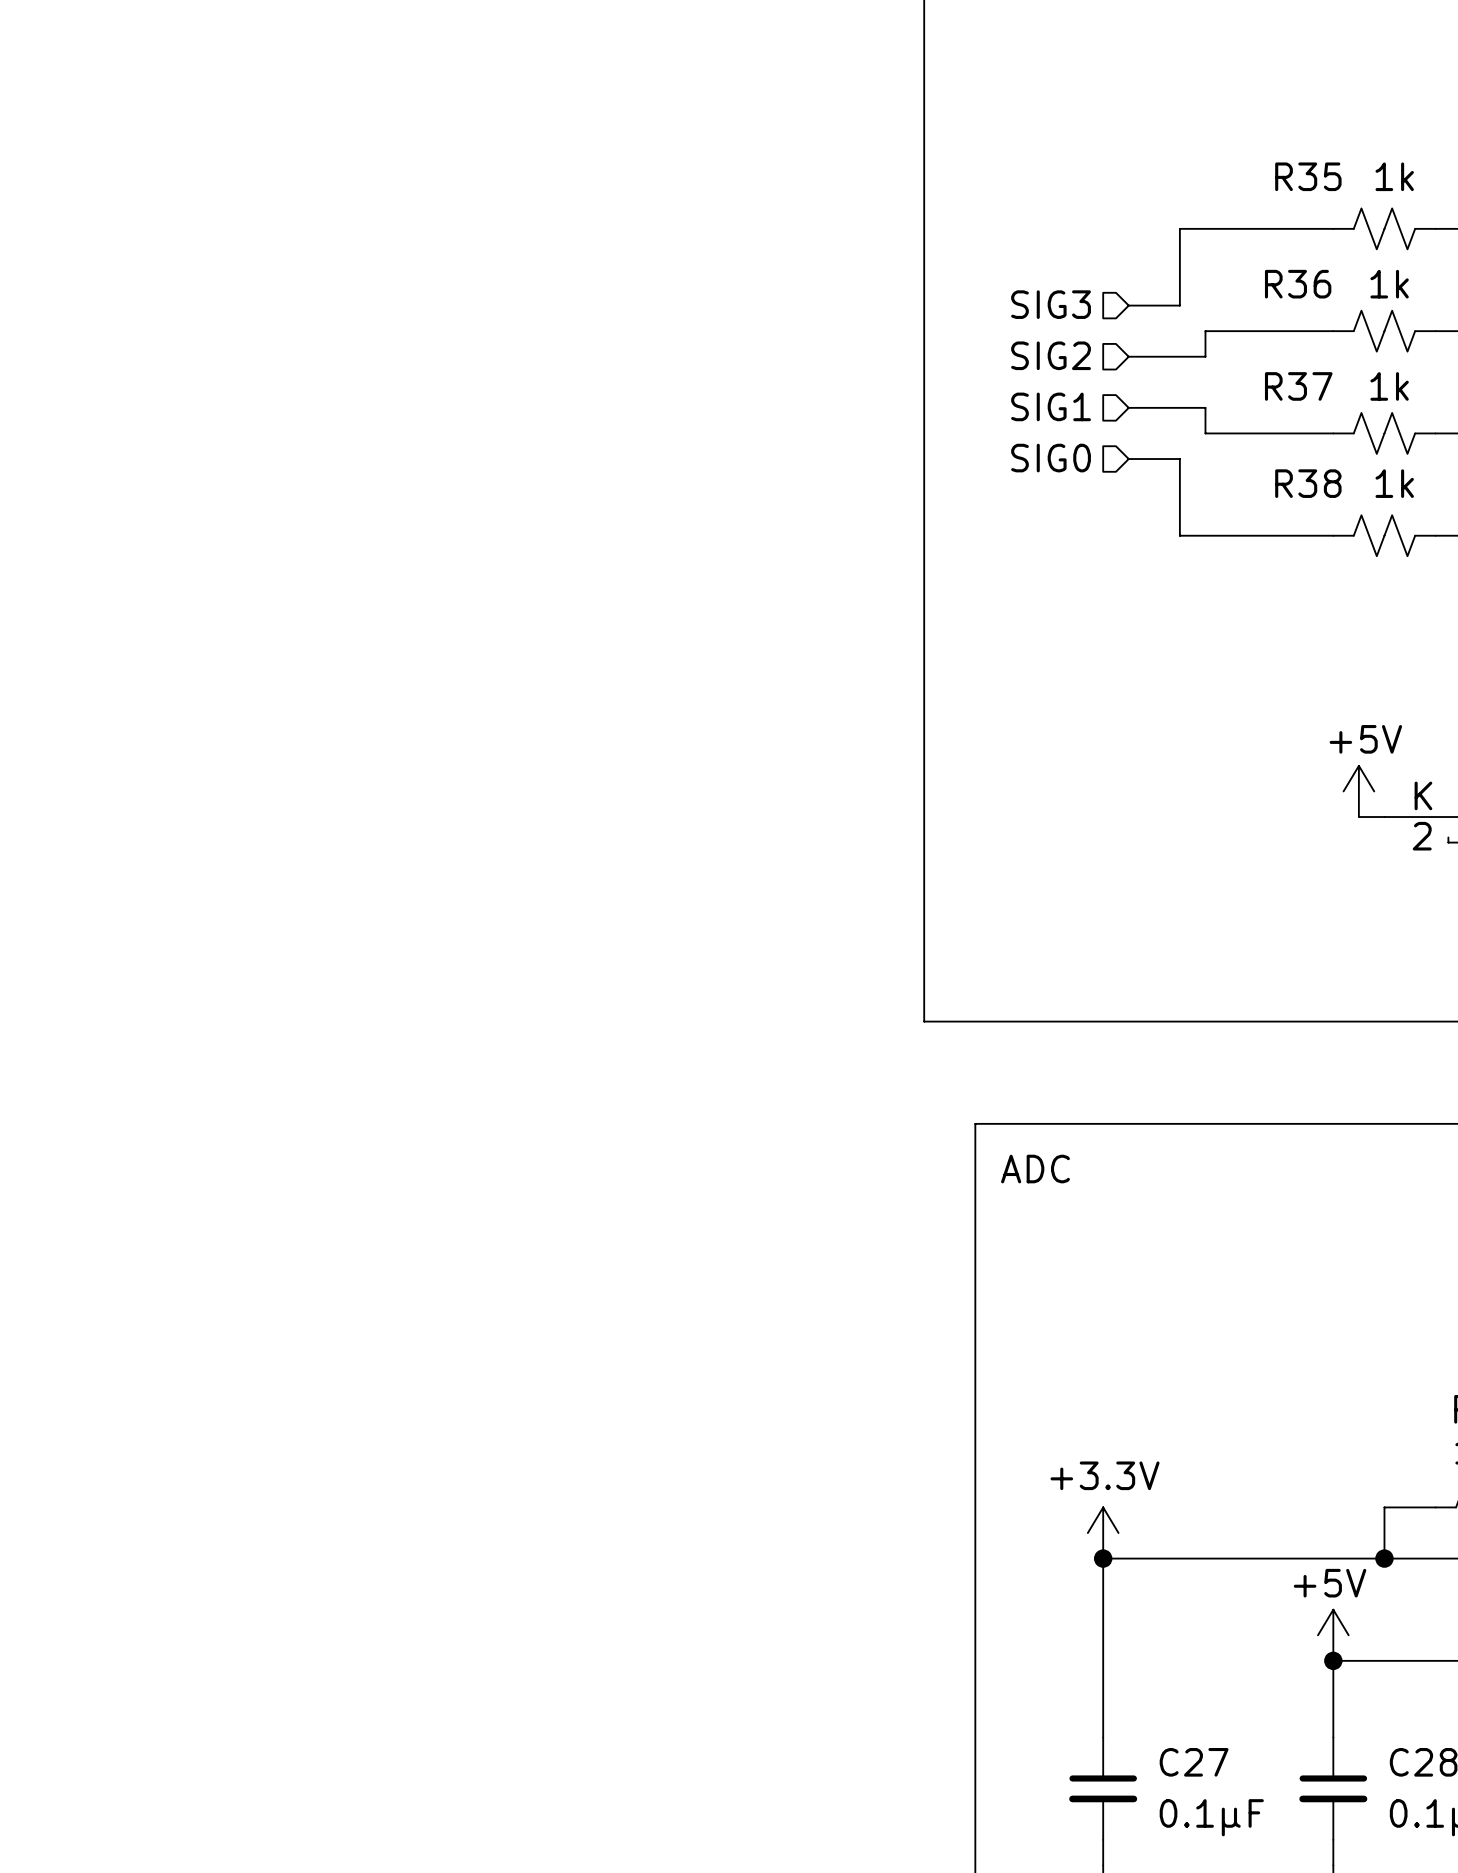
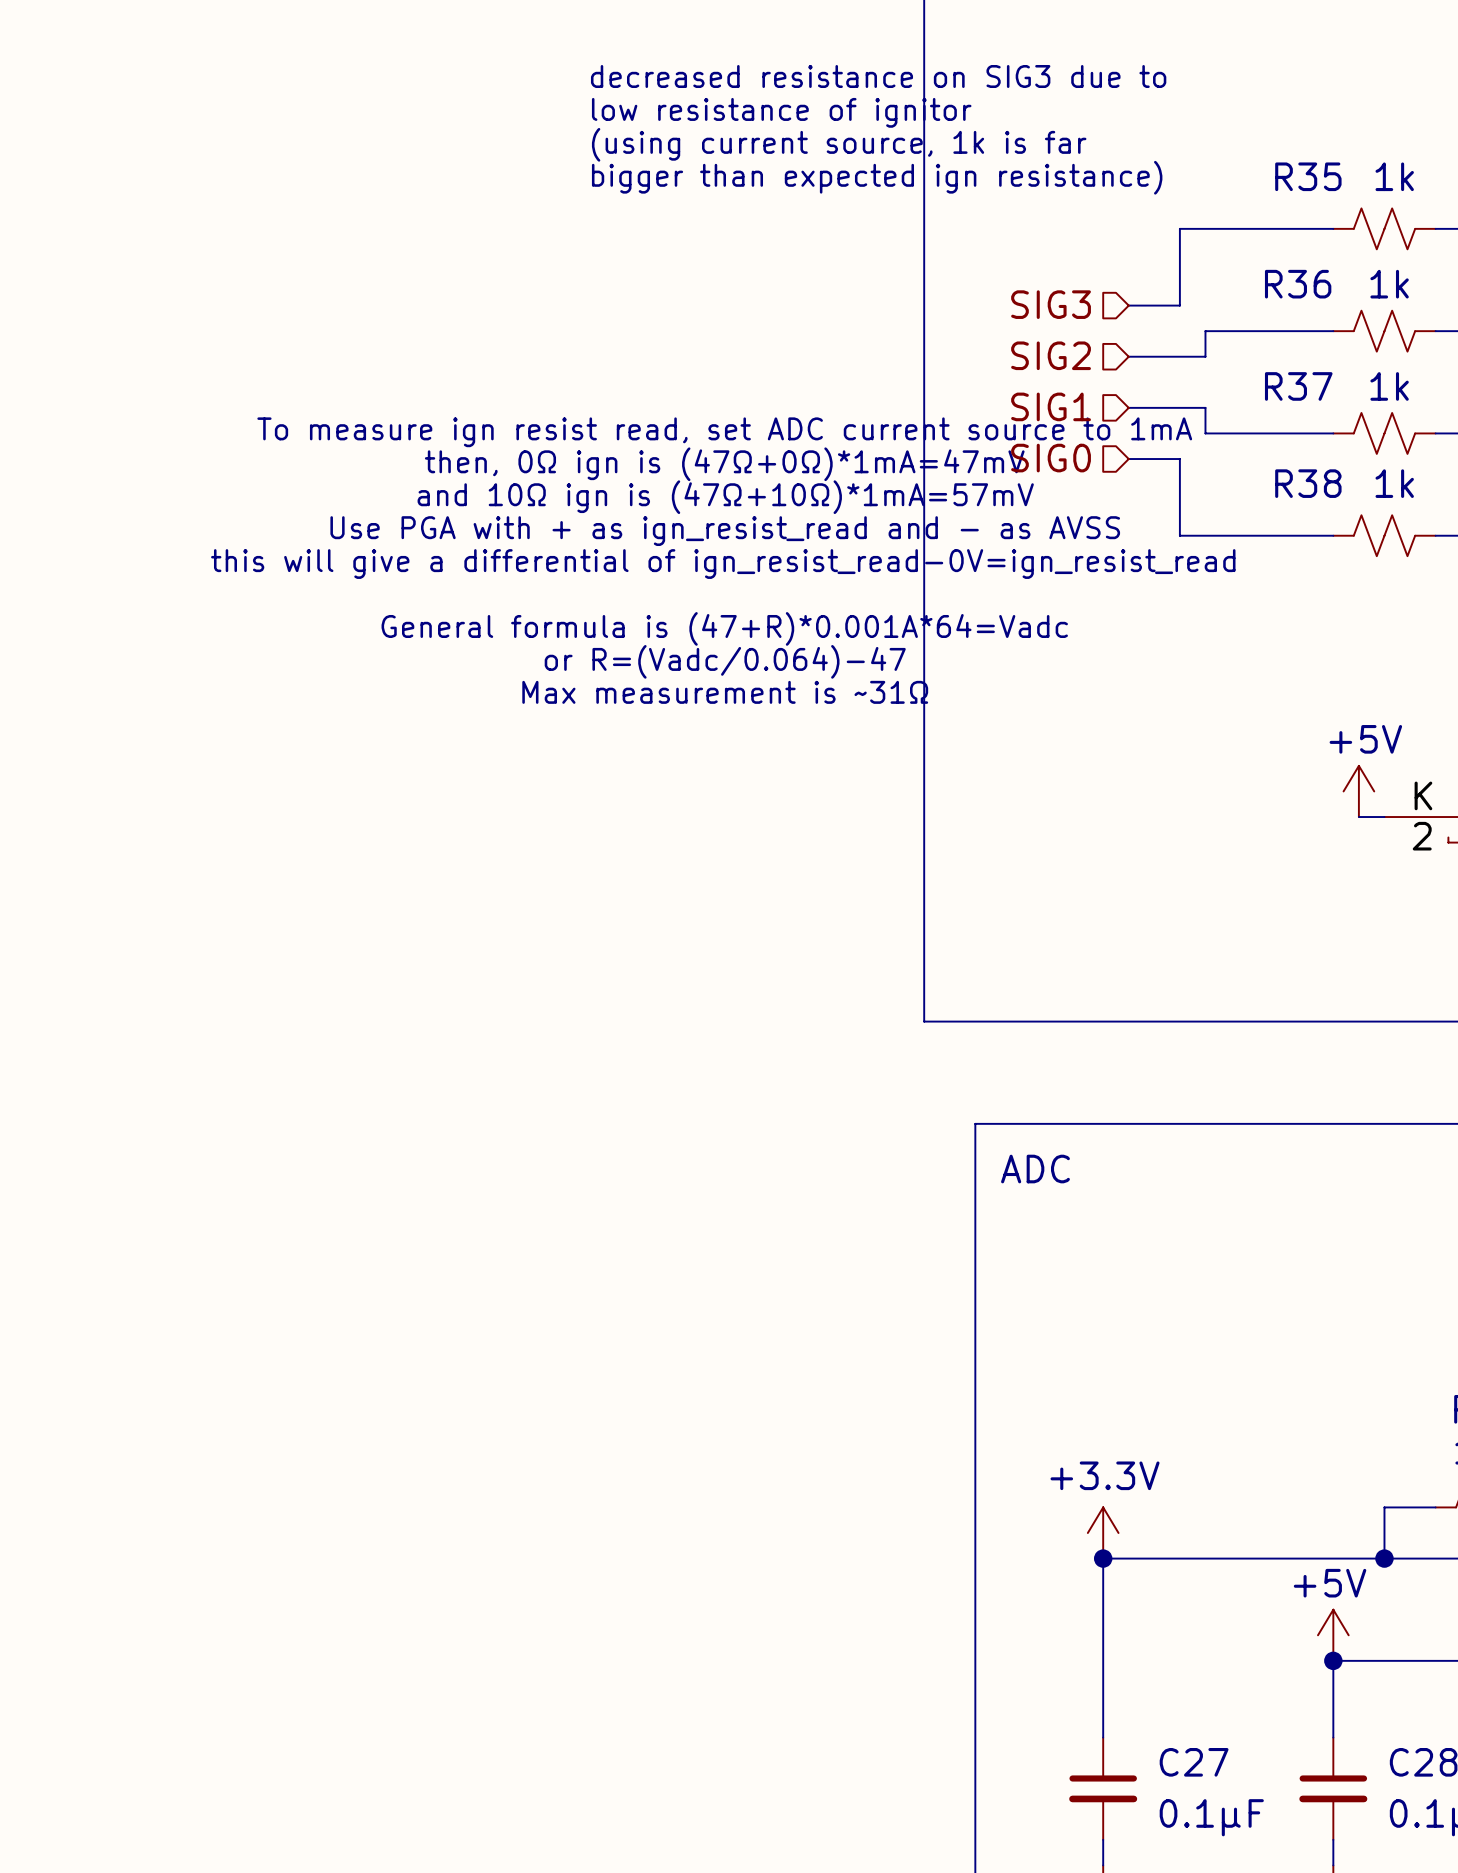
text: none -> decreased resistance on SIG3 due to (878, 76)
text: none -> low resistance of ignitor (781, 112)
text: none -> (using current source, 1k is far (839, 144)
text: none -> bigger than expected ign resistance) (877, 177)
text: none -> To measure ign resist read, set ADC current source to 1mA (724, 432)
text: none -> then, 0Ω ign is (47Ω+0Ω)*1mA=47mV (724, 464)
text: none -> and 10Ω ign is (47Ω+10Ω)*1mA=57mV (725, 497)
text: none -> Use PGA with + as ign_resist_read and - as AVSS (725, 531)
text: none -> this will give a differential of ign_resist_read-0V=ign_resist_read (723, 564)
text: none -> General formula is (47+R)*0.001A*64=Vadc (724, 628)
text: none -> or R=(Vadc/0.064)-47 (725, 661)
text: none -> Max measurement is ~31Ω (725, 692)

